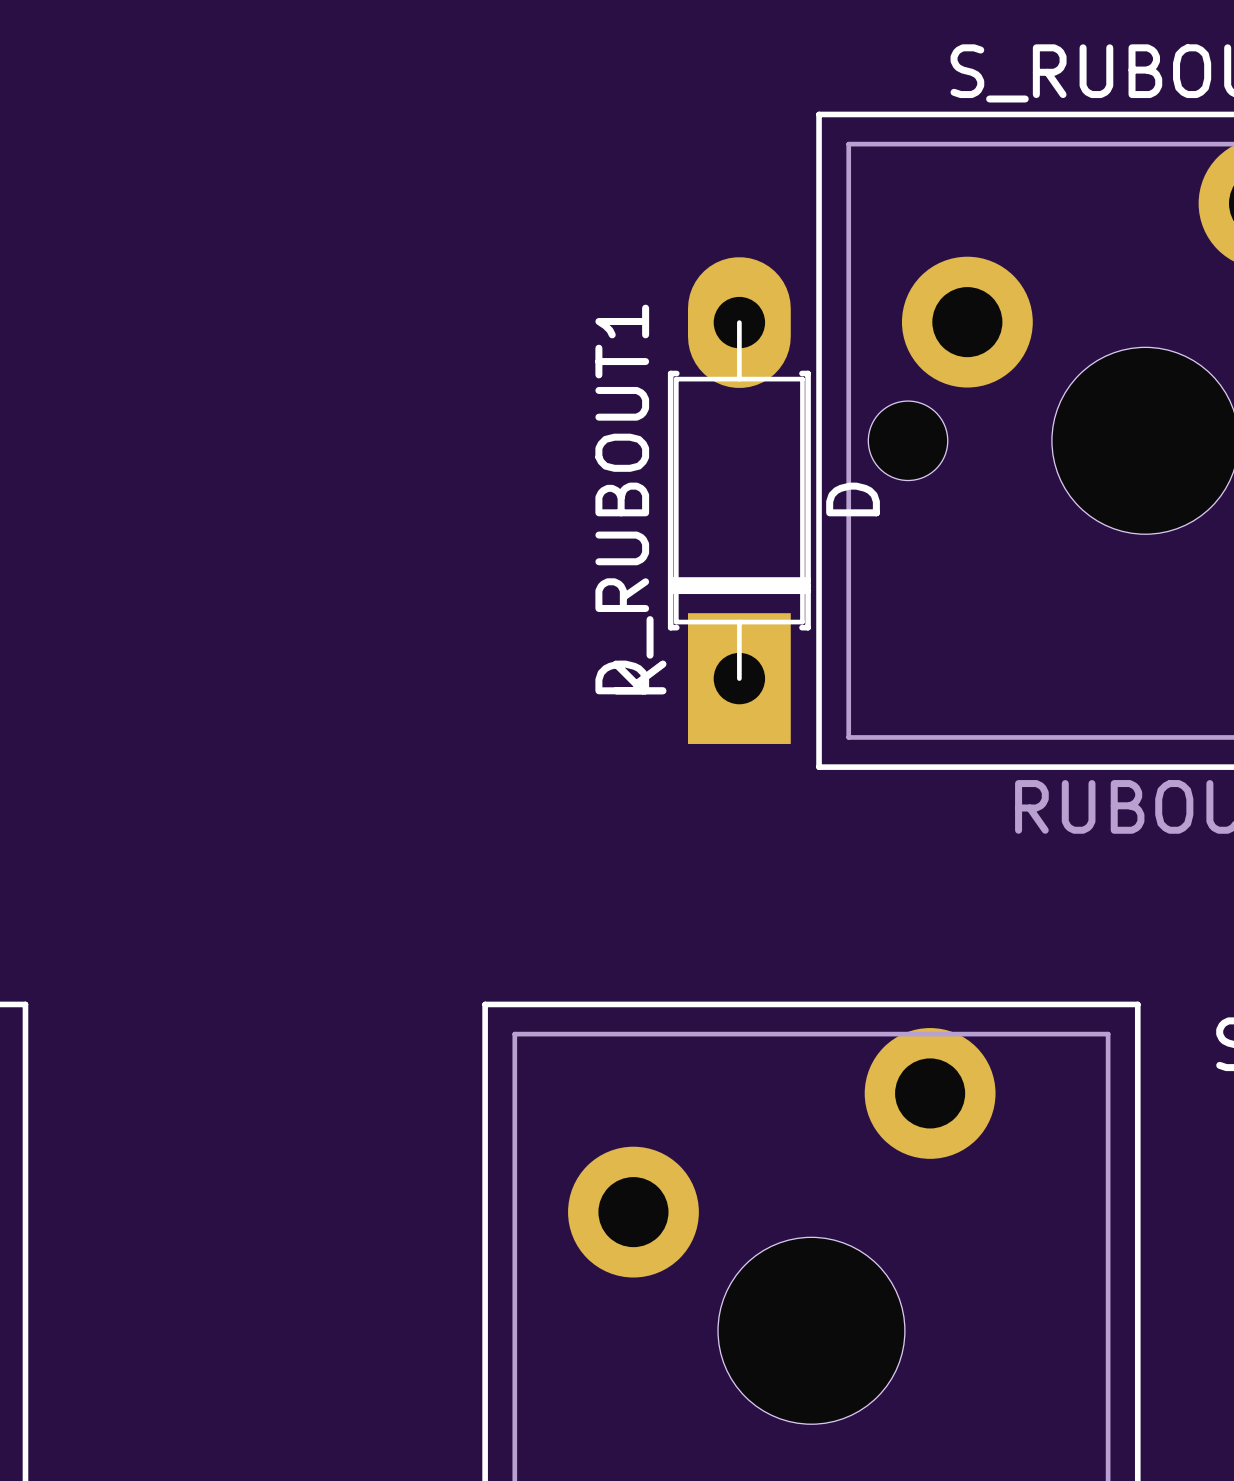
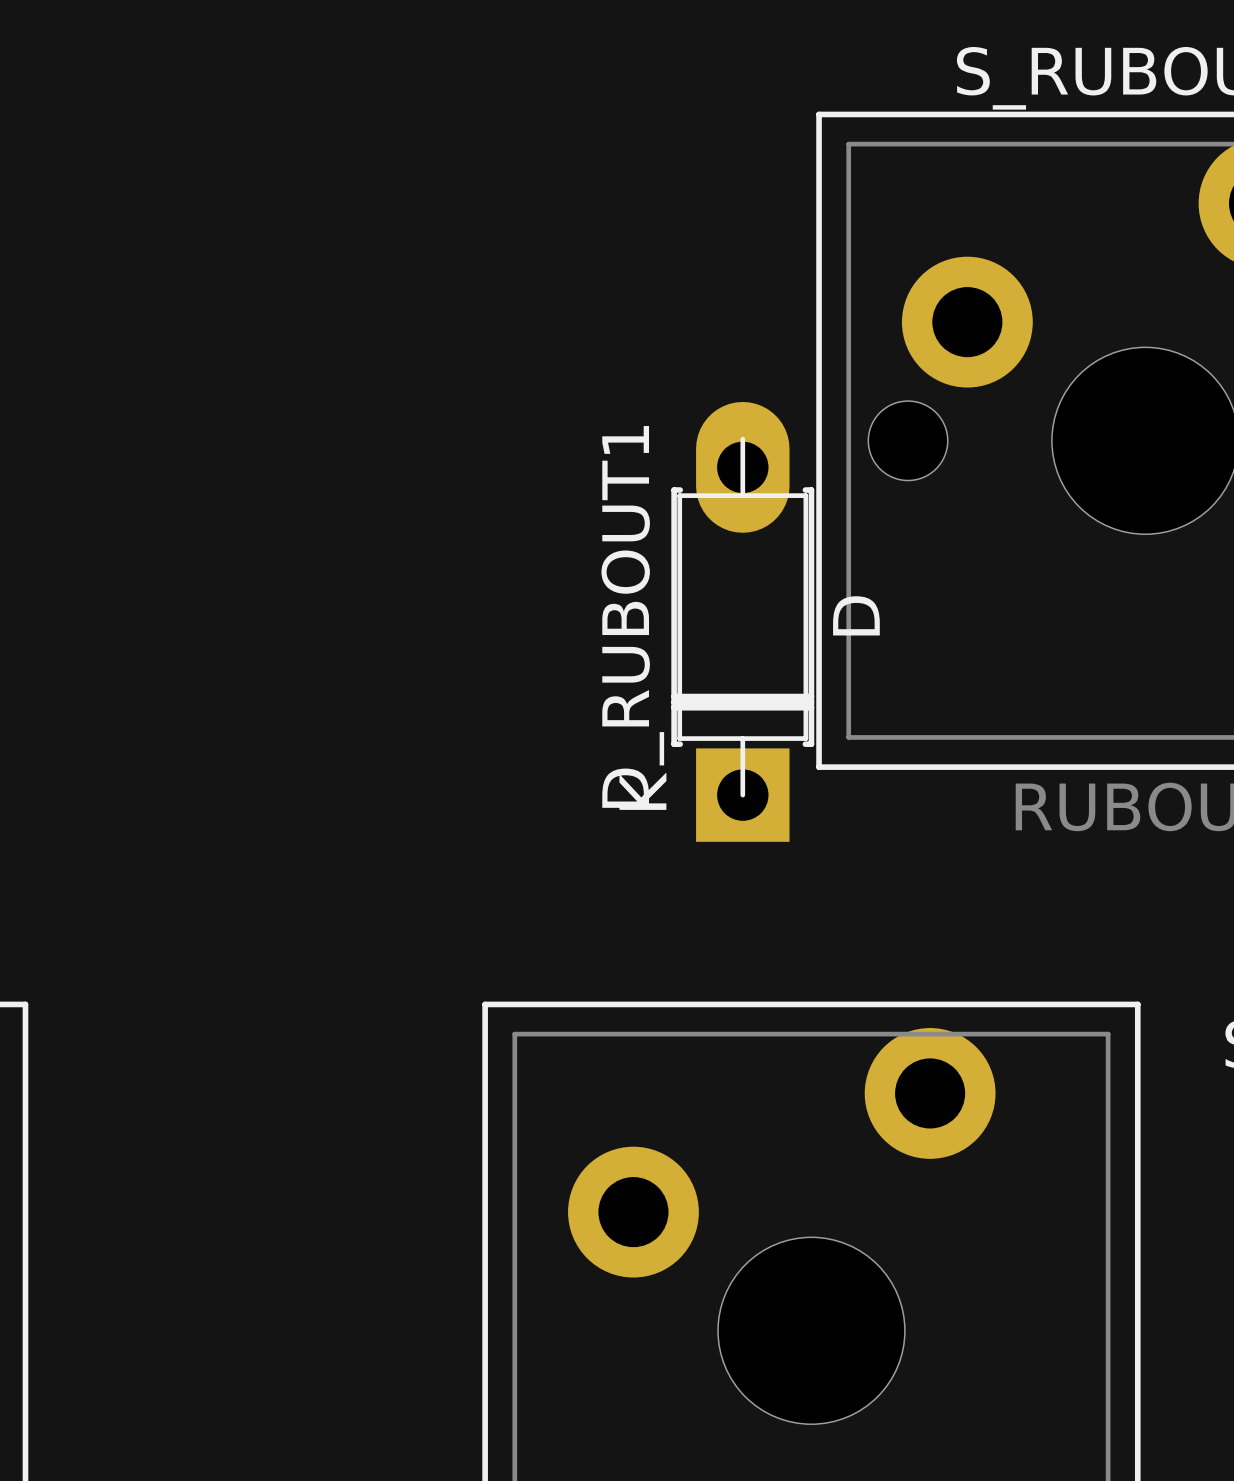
D_RUBOUT1 footprint: [667, 257, 811, 744] -> [671, 401, 815, 842]

